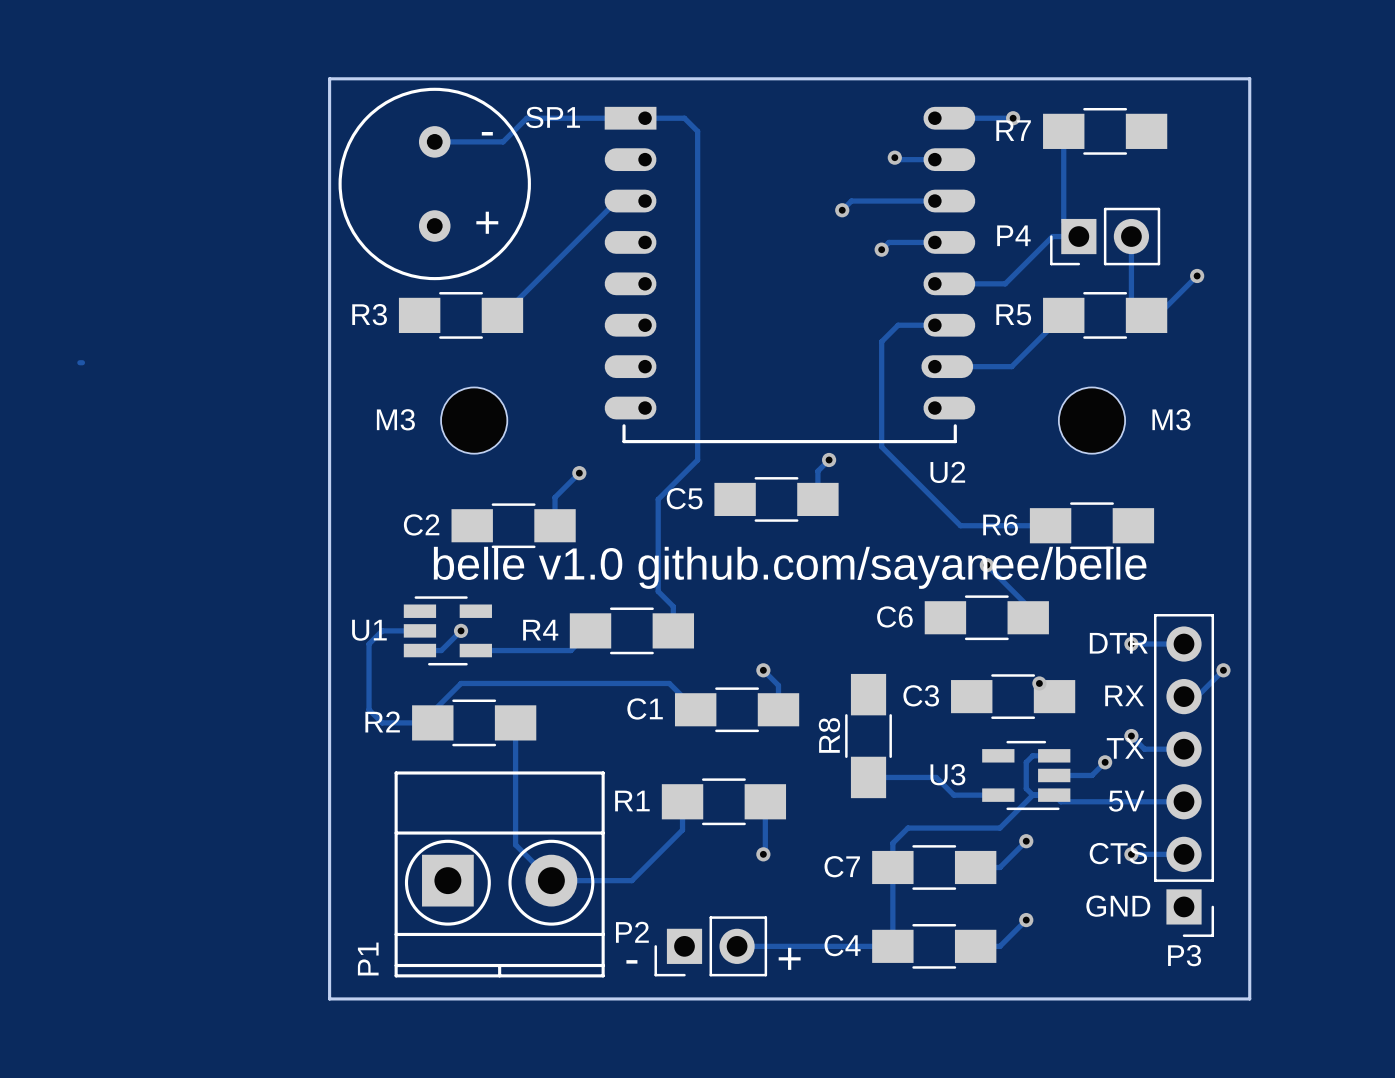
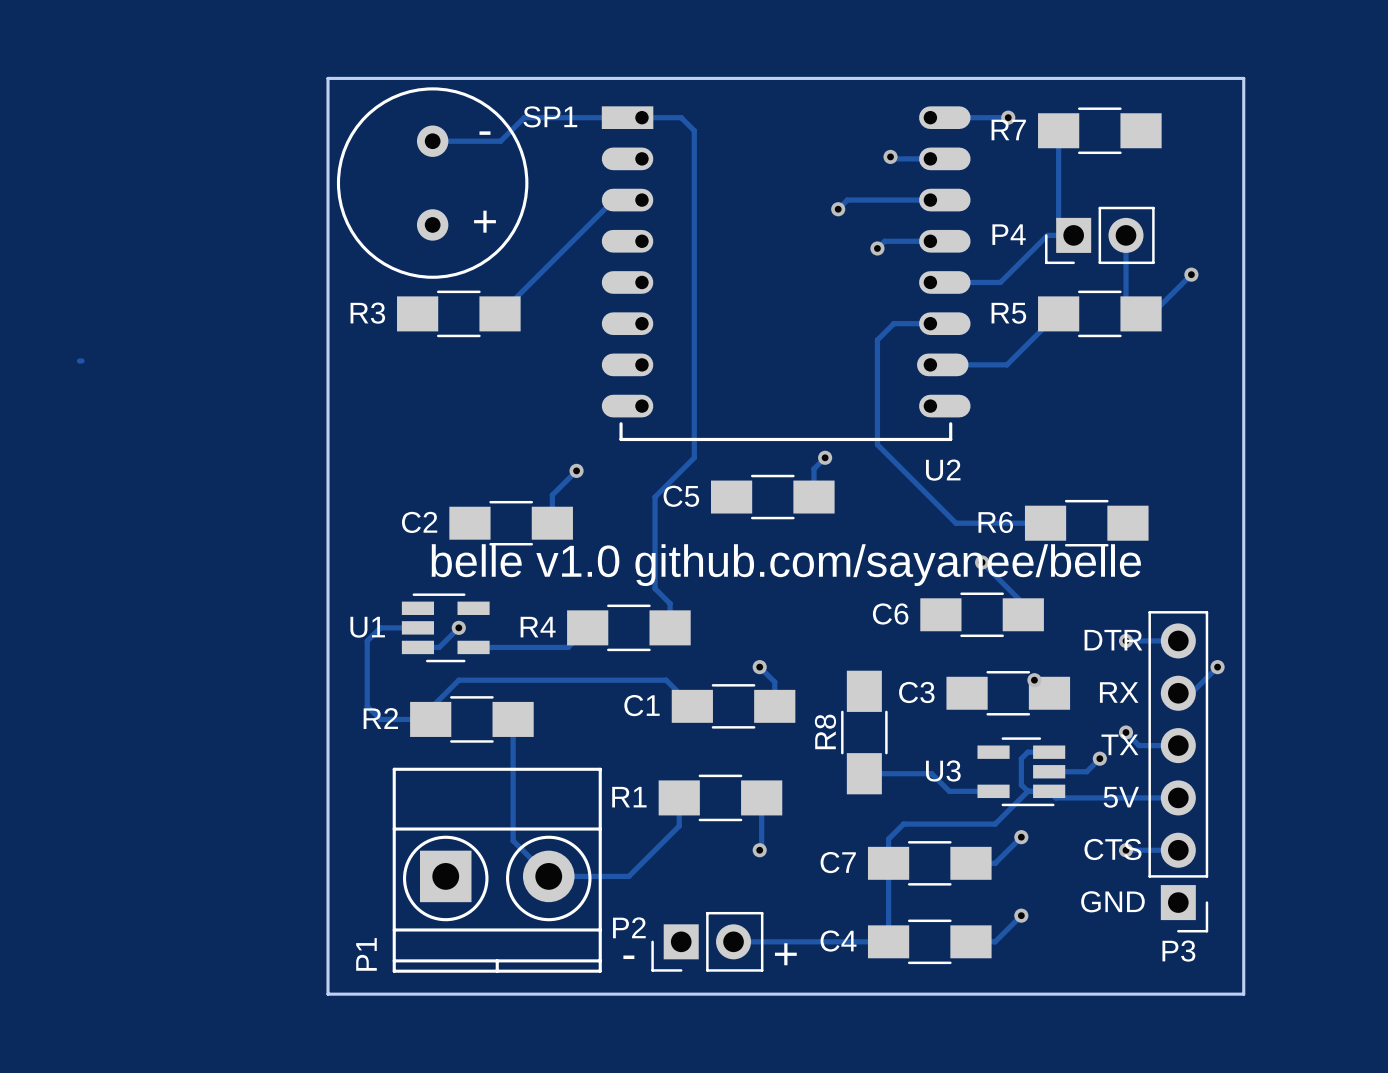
part: M3 (474, 420) -> none
part: M3 (1091, 420) -> none

